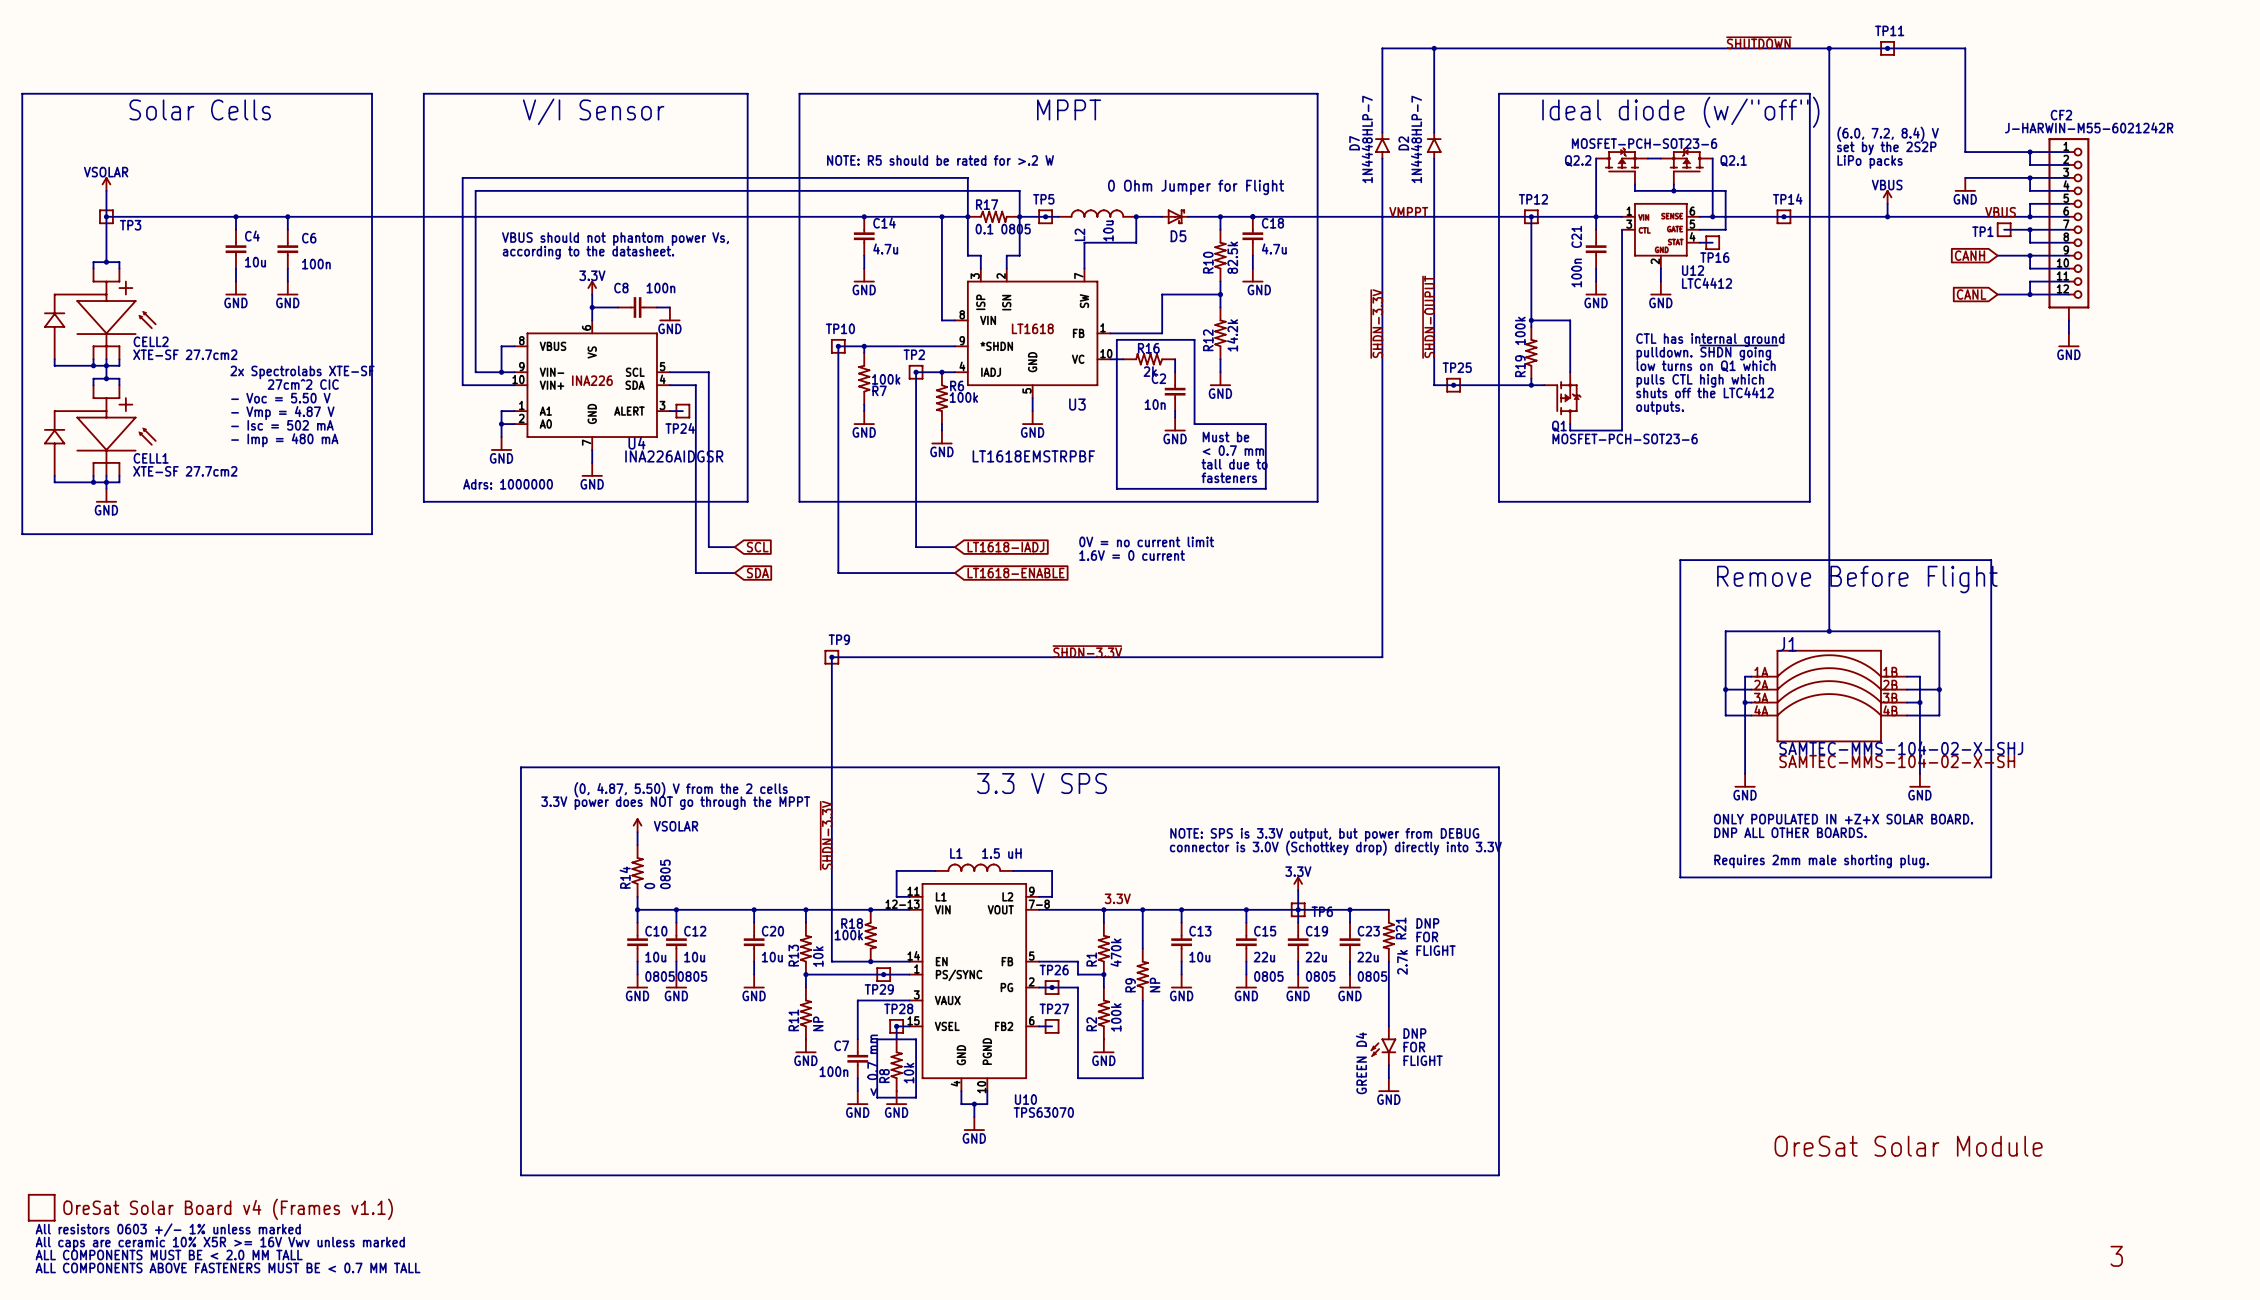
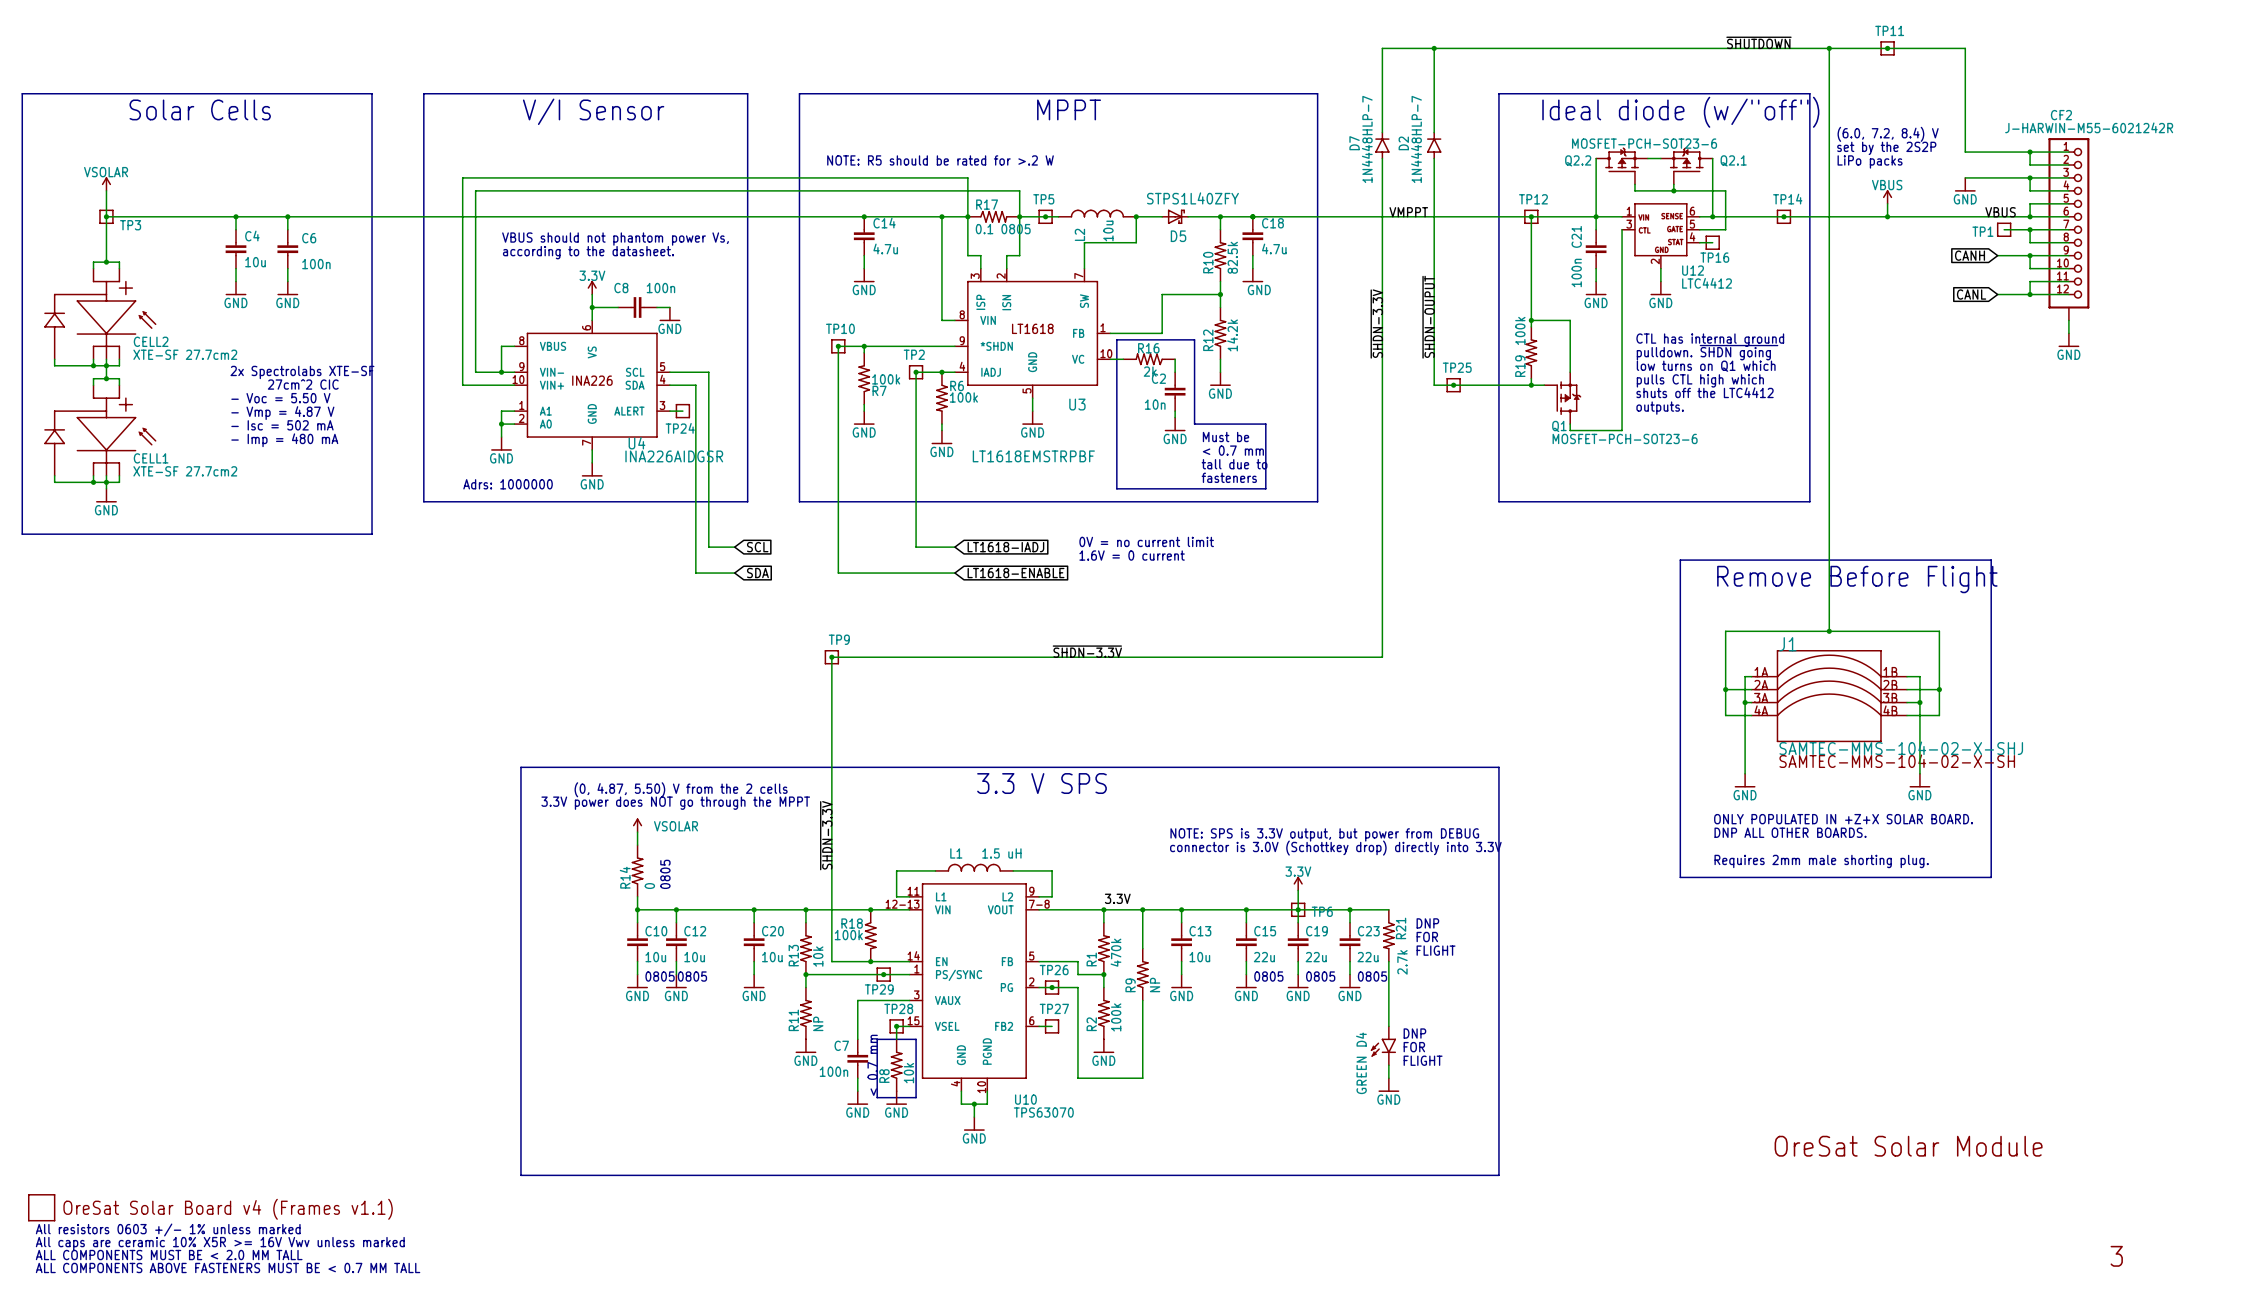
D5 value: 0 Ohm Jumper for Flight (1196, 187) -> STPS1L40ZFY (1192, 198)

